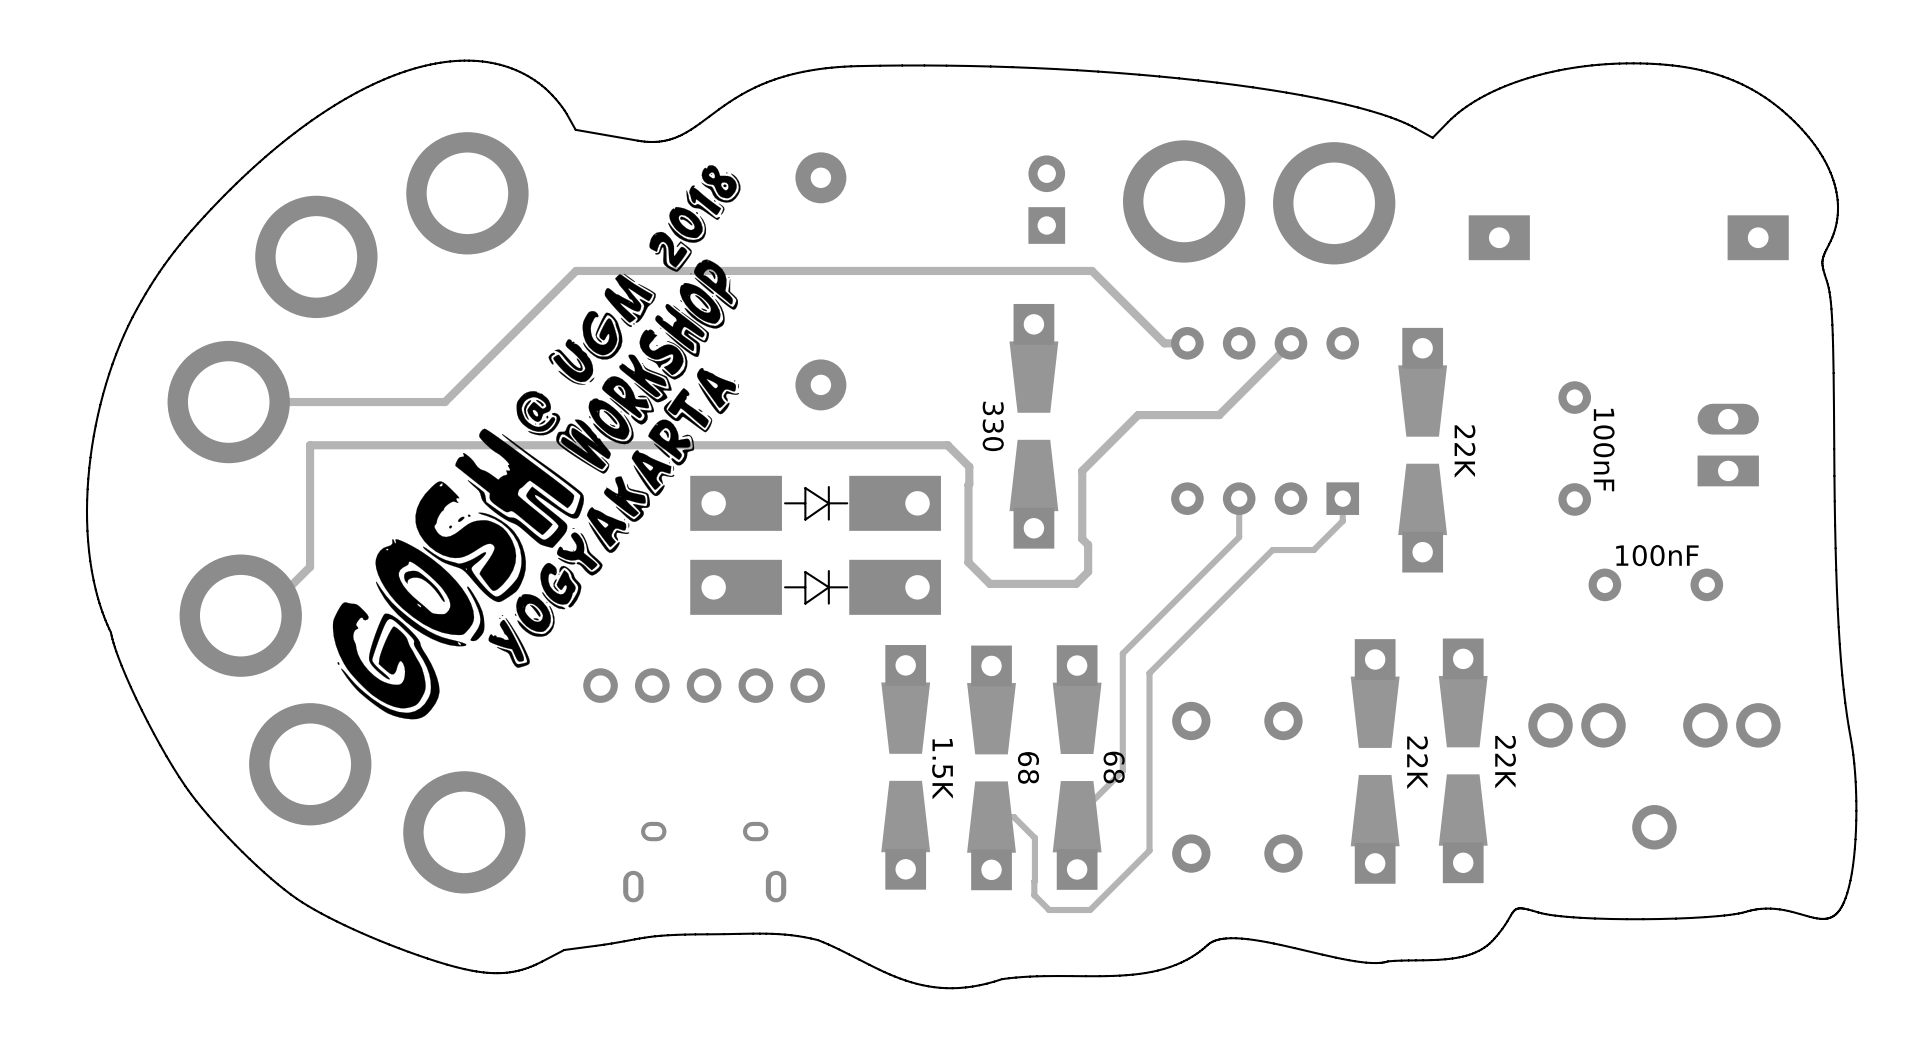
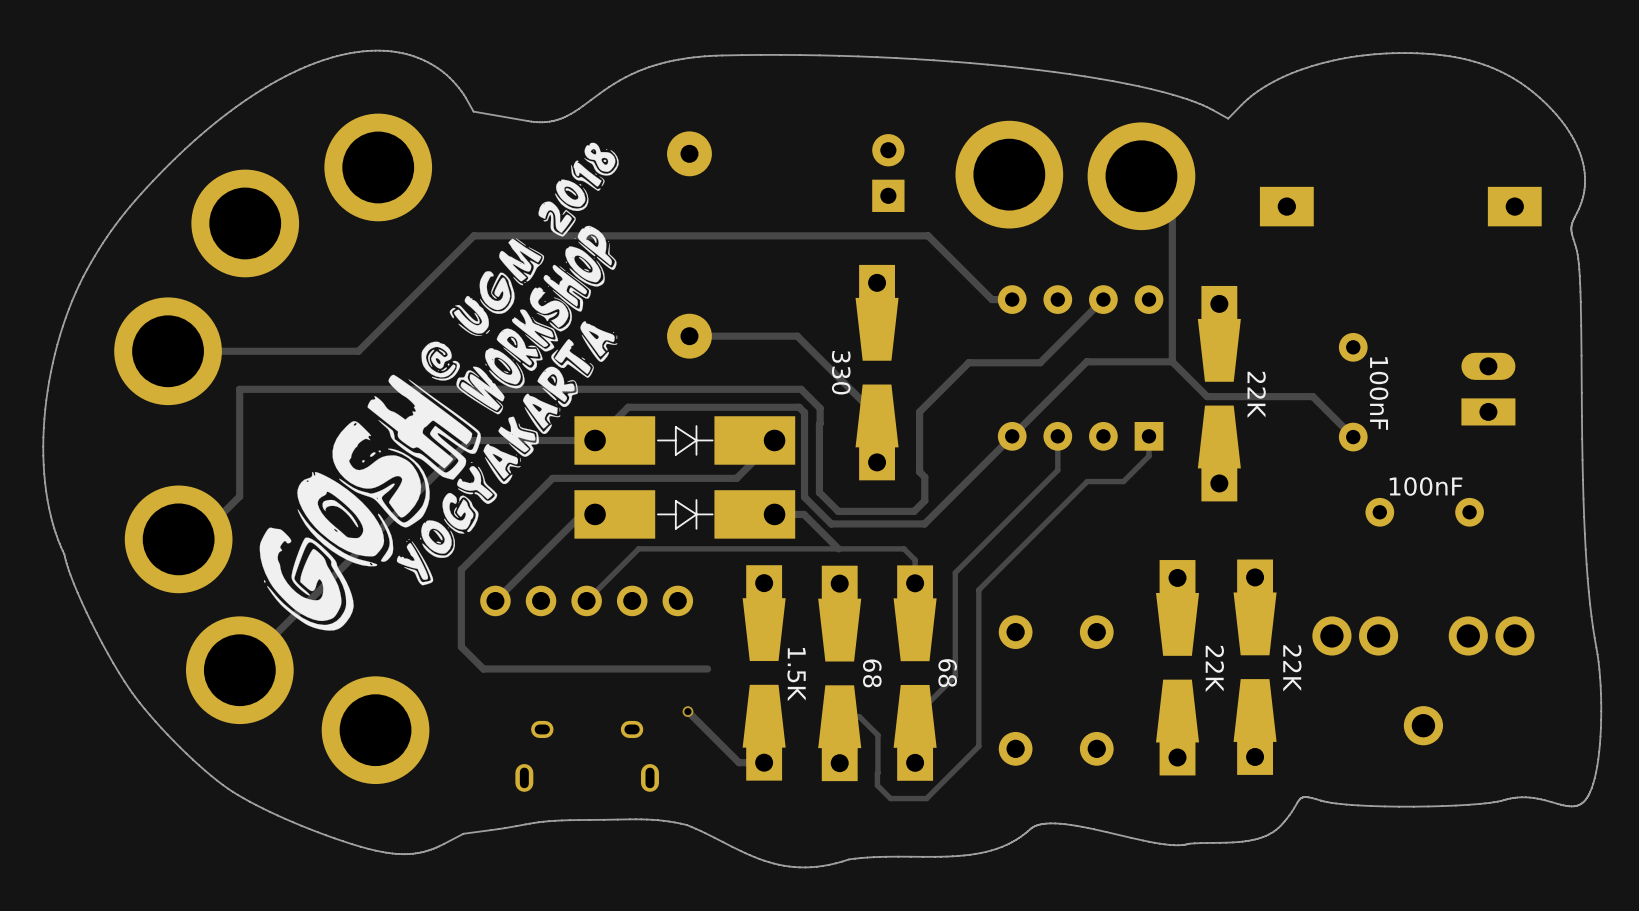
track: none -> (1141, 176) (1172, 207) (1172, 361)
track: none -> (689, 336) (797, 336) (877, 415) (877, 462)
track: none -> (1172, 361) (1207, 396) (1312, 396) (1353, 437)
track: none -> (1172, 361) (1086, 361) (924, 523) (831, 523) (804, 497) (804, 412) (799, 407) (628, 407) (595, 440) (469, 440) (239, 670)
track: none -> (774, 440) (736, 478) (552, 478) (461, 569) (461, 646) (483, 668) (707, 668)
track: none -> (595, 514) (581, 514) (495, 600)
track: none -> (774, 514) (804, 514) (838, 548)
track: none -> (586, 600) (638, 548) (904, 548) (915, 559) (915, 629)
track: none -> (687, 711) (739, 762) (764, 762) (764, 716)
via: none -> (687, 711)

